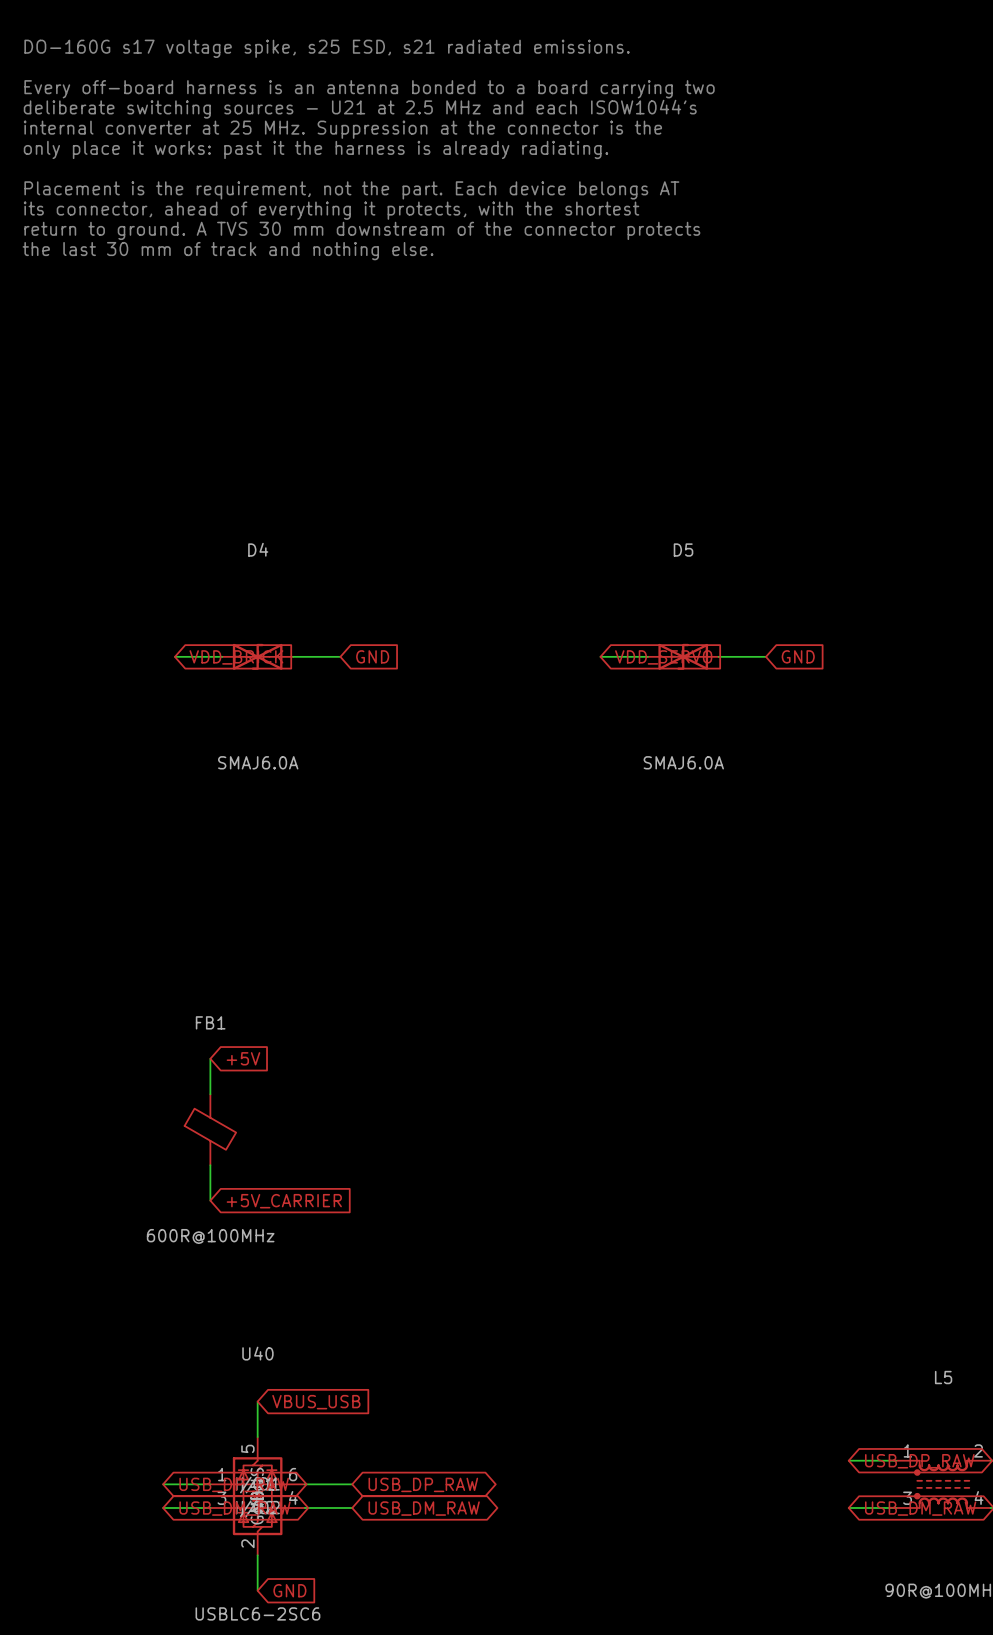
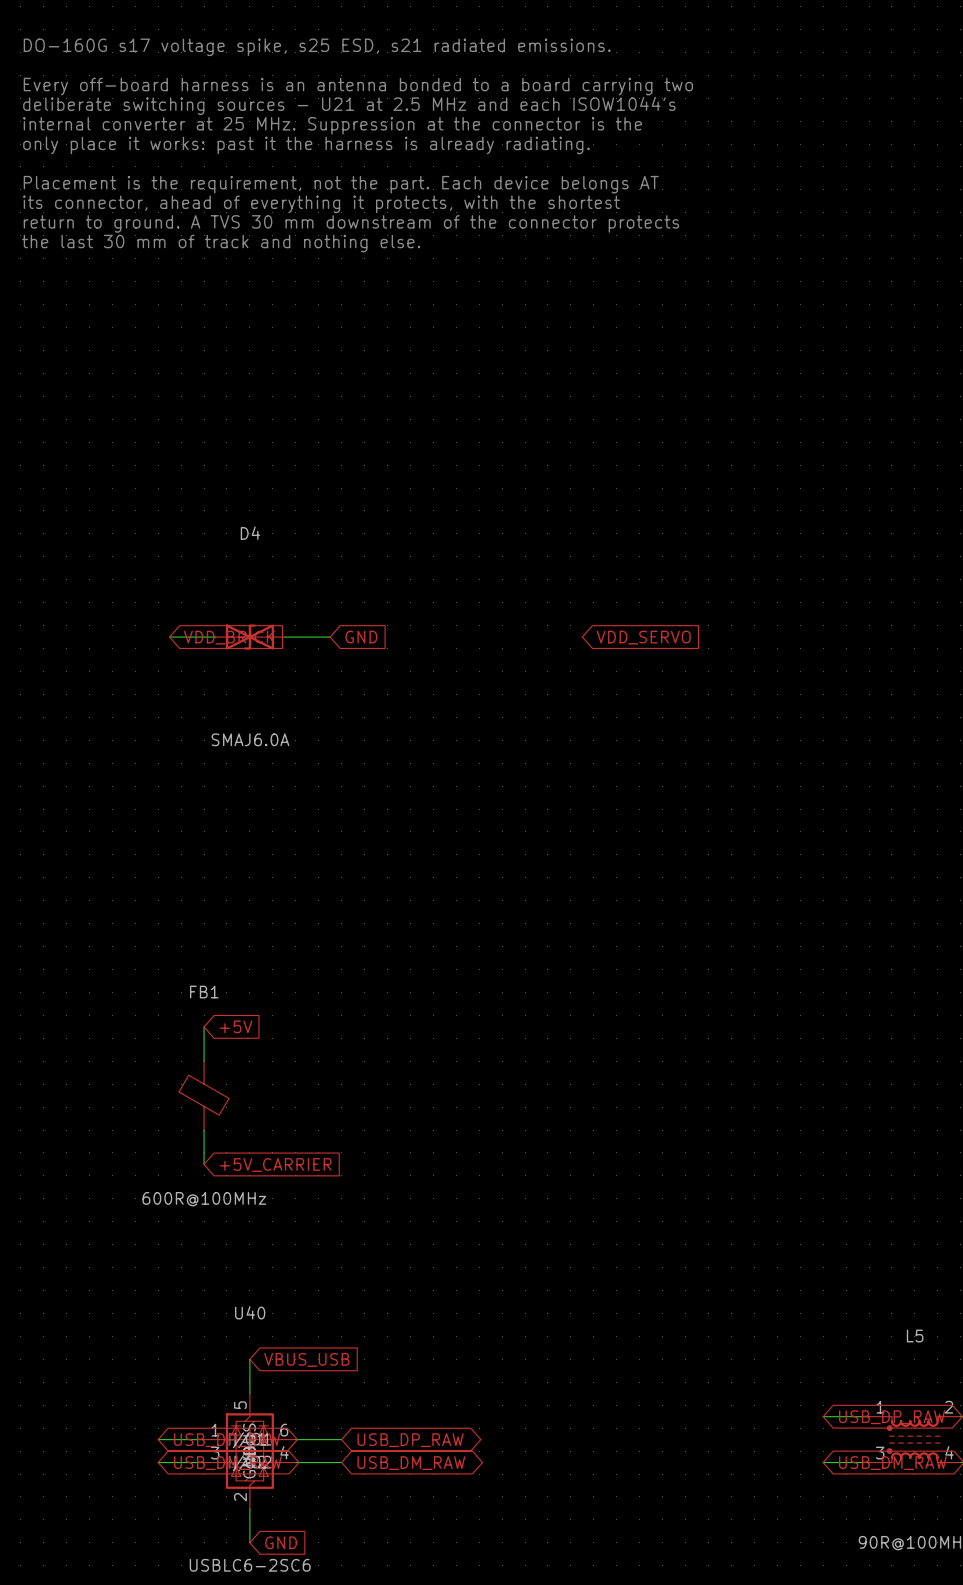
wire: (600, 656) (647, 656) -> none
D5: SMAJ6.0A (683, 656) -> none
wire: (718, 656) (765, 656) -> none
global label: GND (798, 656) -> none

